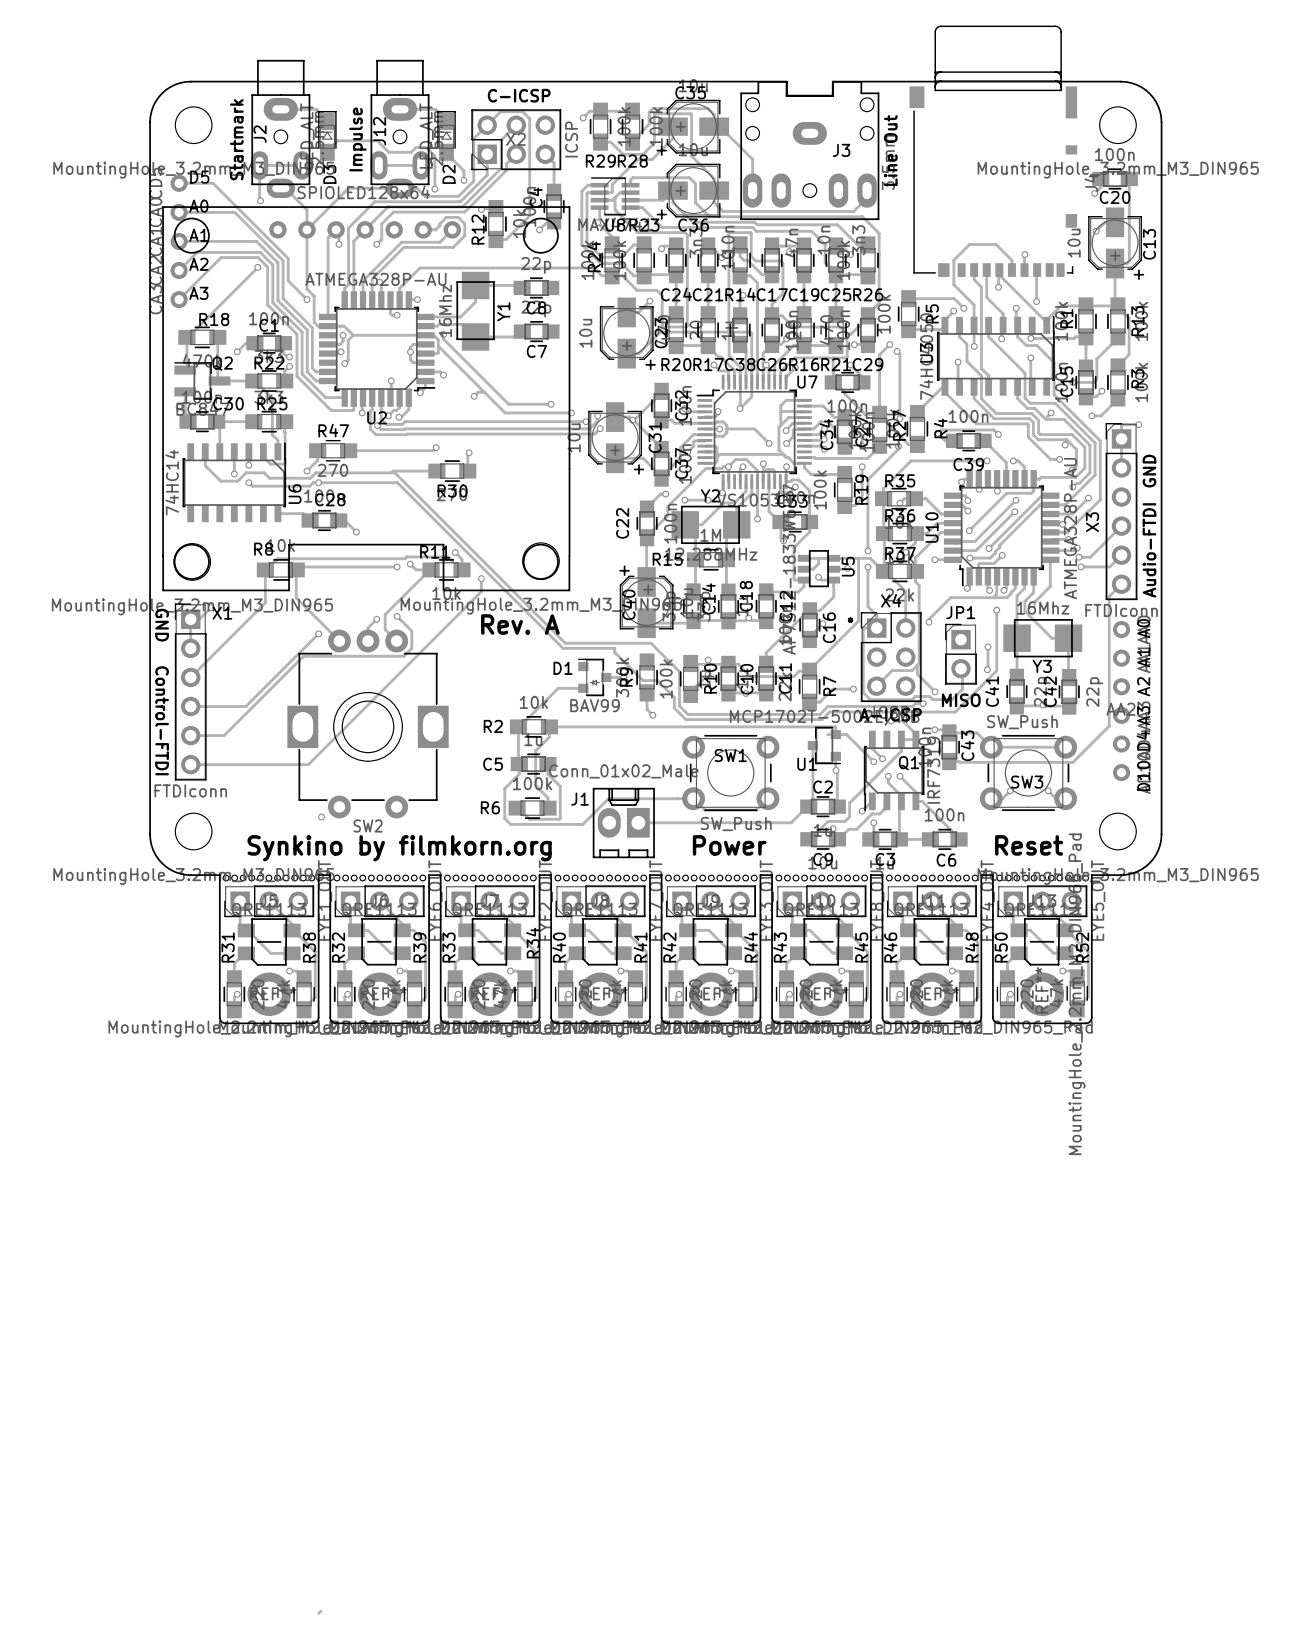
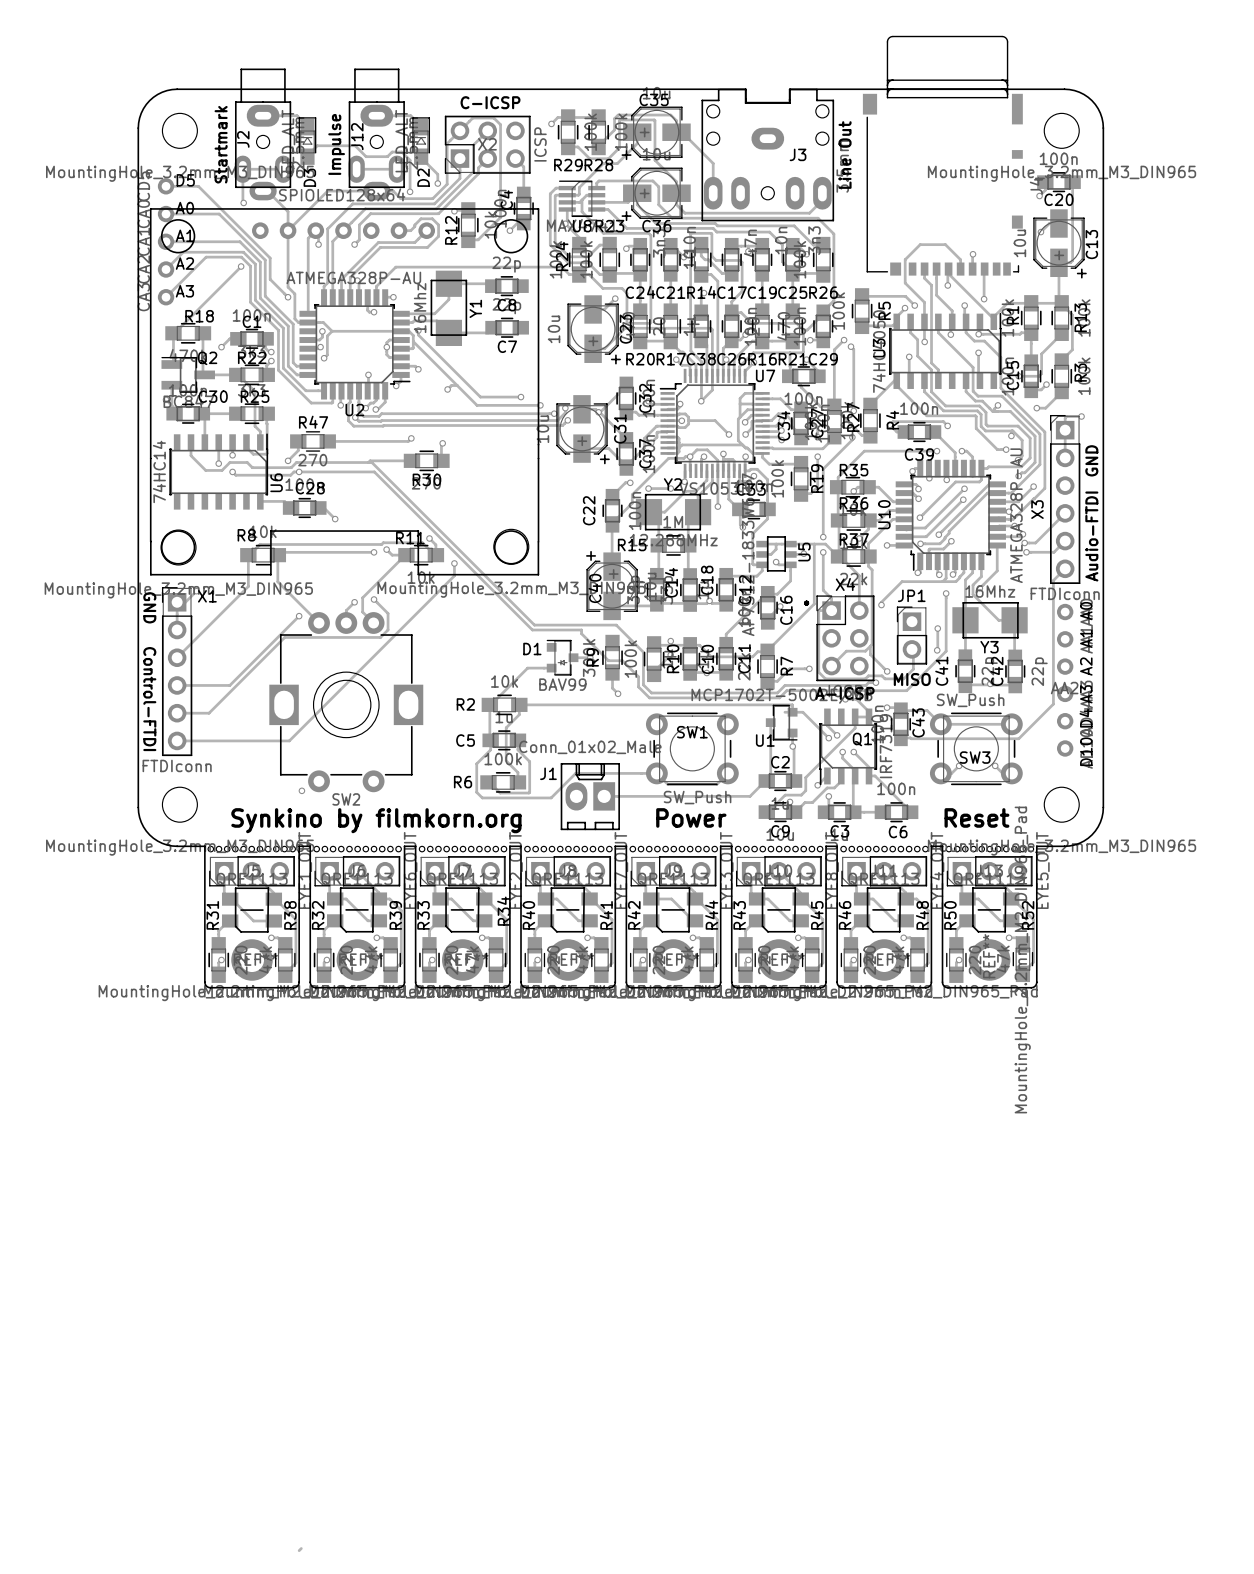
text: Rev. A (520, 624) -> none

